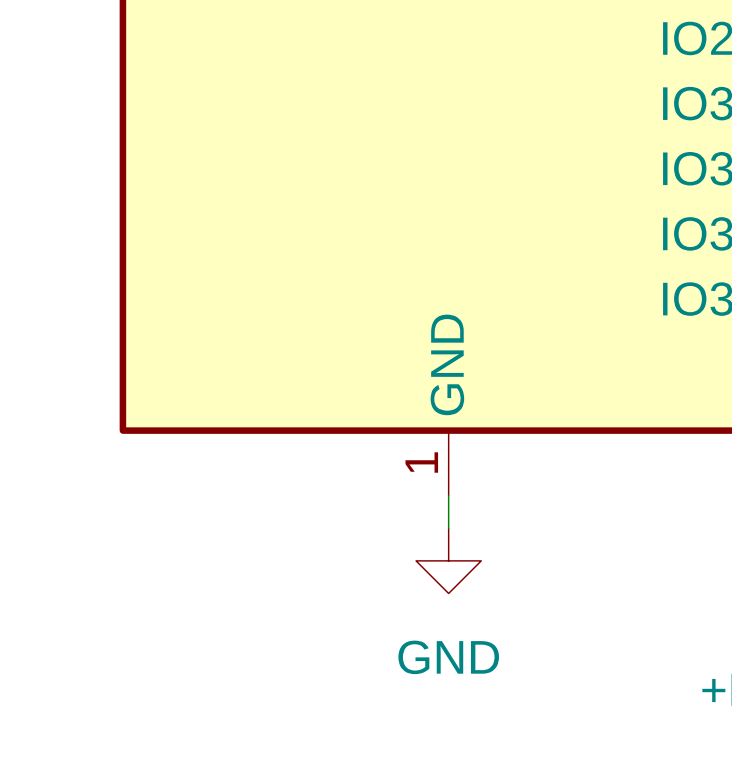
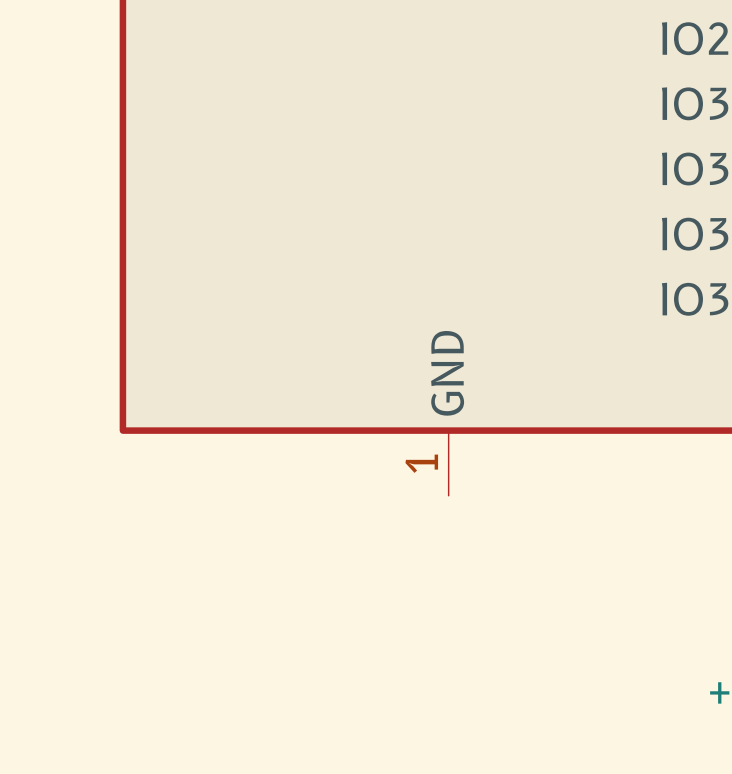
wire: (448, 495) (448, 528) -> none
power symbol: GND (448, 560) -> none

